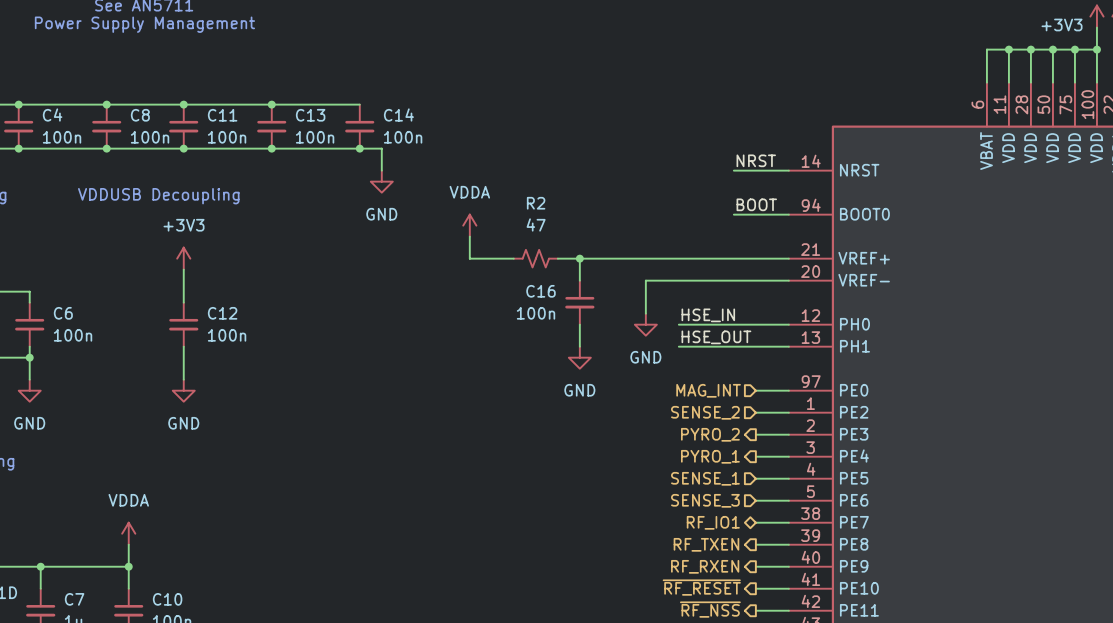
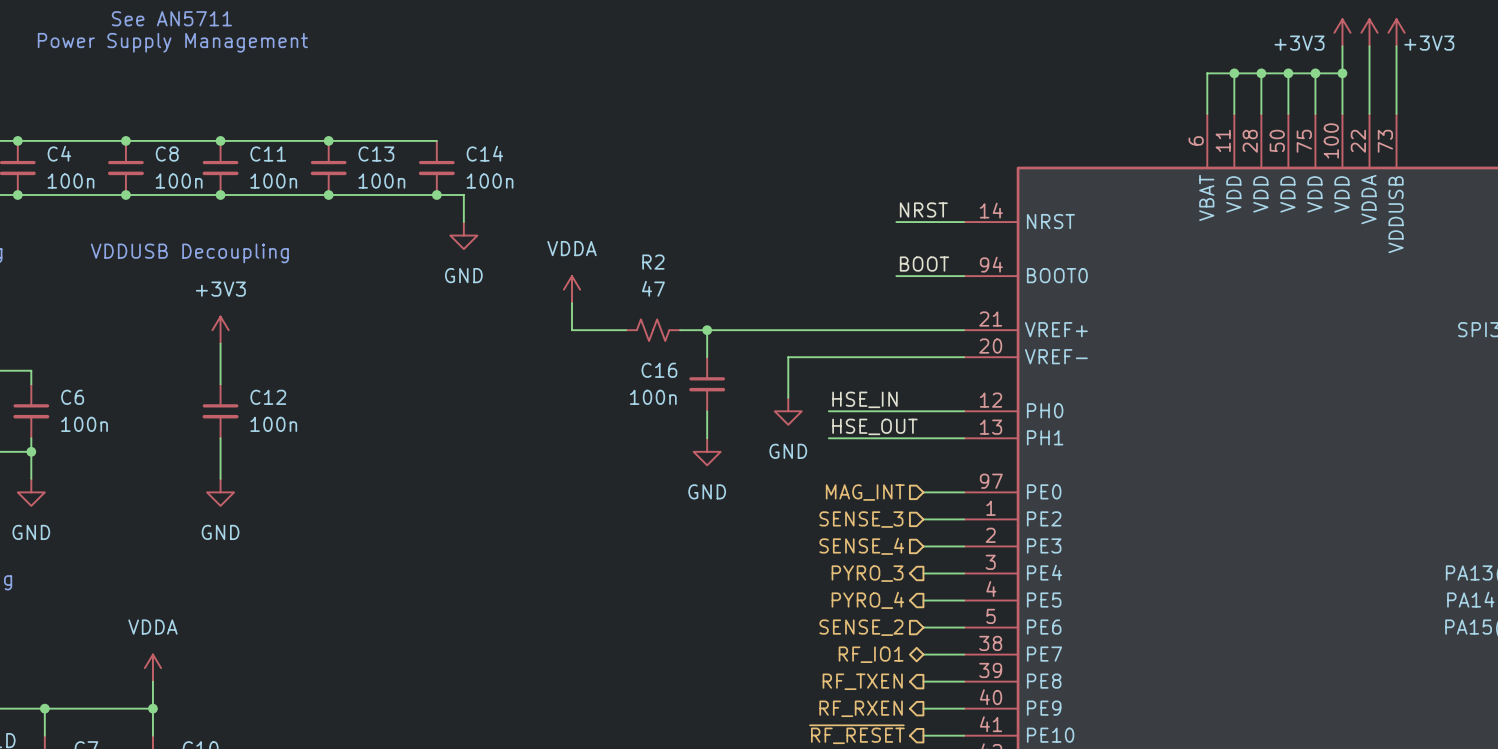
hierarchical label: SENSE_2 (705, 412) -> SENSE_3 (861, 519)
hierarchical label shape: output (710, 434) -> input (861, 546)
hierarchical label: PYRO_2 (710, 434) -> SENSE_4 (861, 546)
hierarchical label: PYRO_1 (710, 456) -> PYRO_3 (867, 573)
hierarchical label shape: input (705, 478) -> output (867, 600)
hierarchical label: SENSE_1 (705, 478) -> PYRO_4 (867, 600)
hierarchical label: SENSE_3 (705, 500) -> SENSE_2 (861, 627)

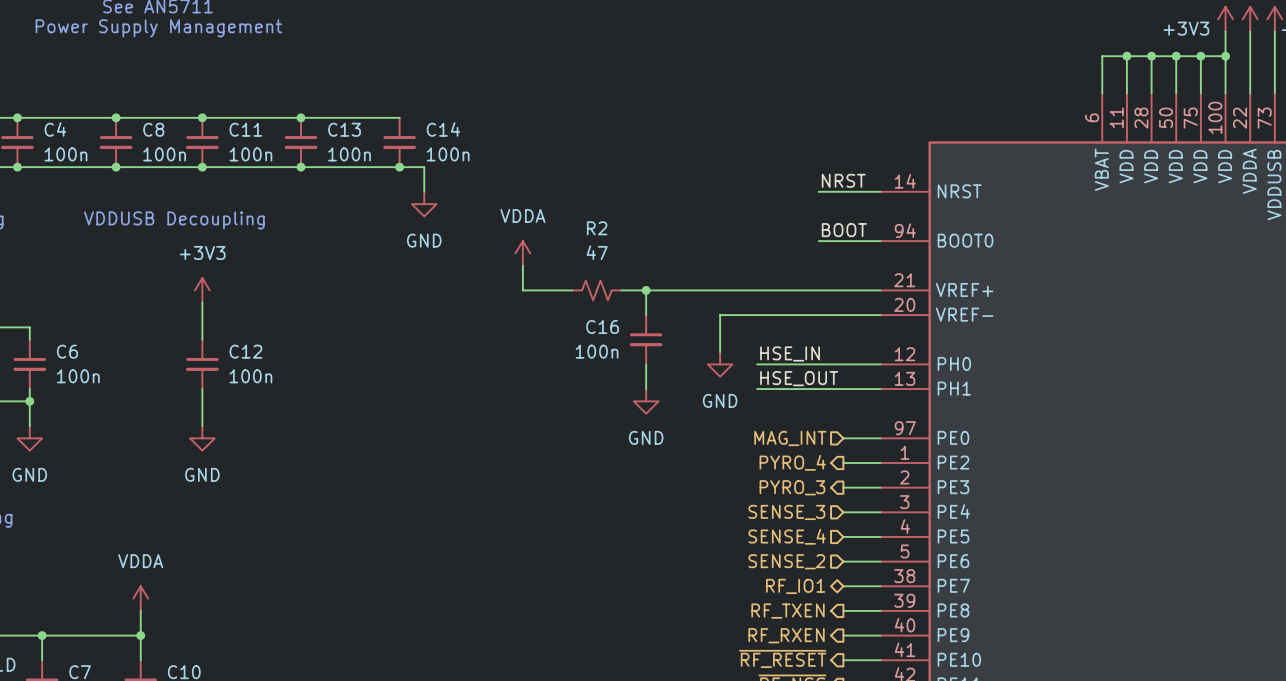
hierarchical label shape: input (861, 519) -> output (792, 462)
hierarchical label: SENSE_3 (861, 519) -> PYRO_4 (792, 462)
hierarchical label shape: input (861, 546) -> output (792, 487)
hierarchical label: SENSE_4 (861, 546) -> PYRO_3 (792, 487)
hierarchical label shape: output (867, 573) -> input (786, 512)
hierarchical label: PYRO_3 (867, 573) -> SENSE_3 (786, 512)
hierarchical label shape: output (867, 600) -> input (787, 536)
hierarchical label: PYRO_4 (867, 600) -> SENSE_4 (787, 536)

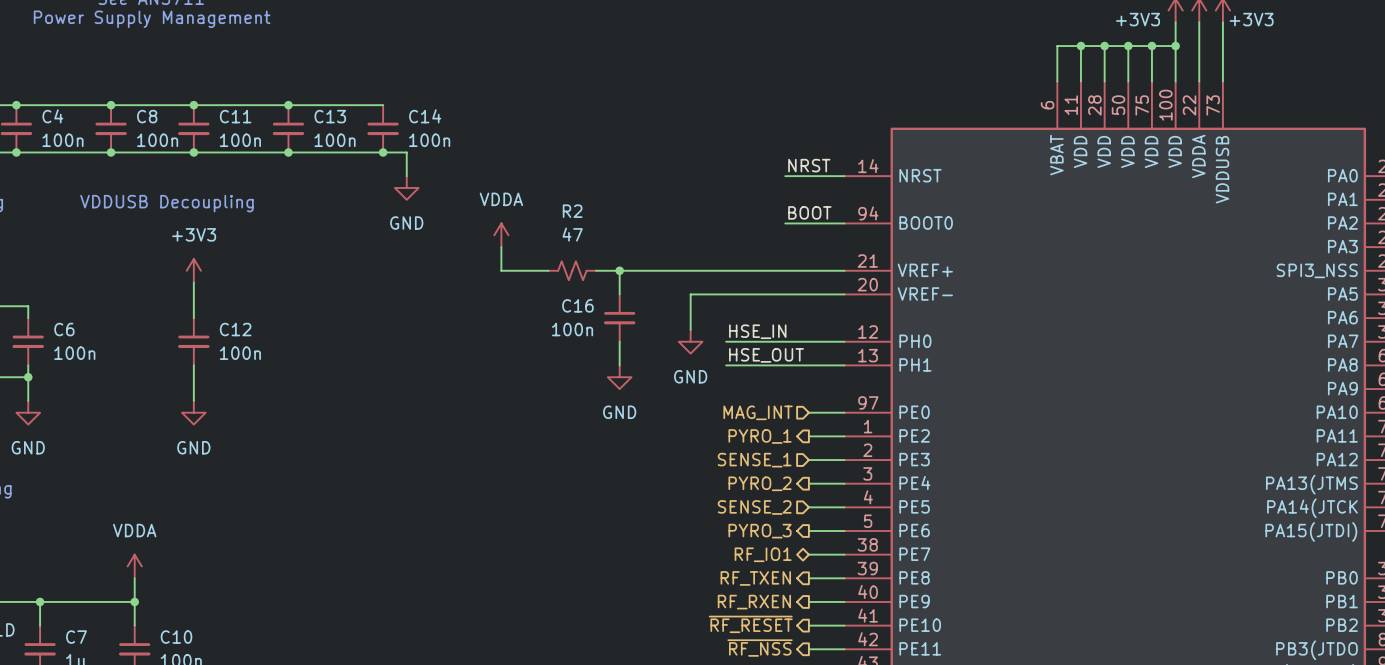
hierarchical label: PYRO_4 (792, 462) -> PYRO_1 (760, 436)
hierarchical label shape: output (792, 487) -> input (754, 460)
hierarchical label: PYRO_3 (792, 487) -> SENSE_1 (754, 460)
hierarchical label shape: input (786, 512) -> output (760, 483)
hierarchical label: SENSE_3 (786, 512) -> PYRO_2 (760, 483)
hierarchical label: SENSE_4 (787, 536) -> SENSE_2 (754, 507)
hierarchical label shape: input (786, 561) -> output (760, 531)
hierarchical label: SENSE_2 (786, 561) -> PYRO_3 (760, 531)

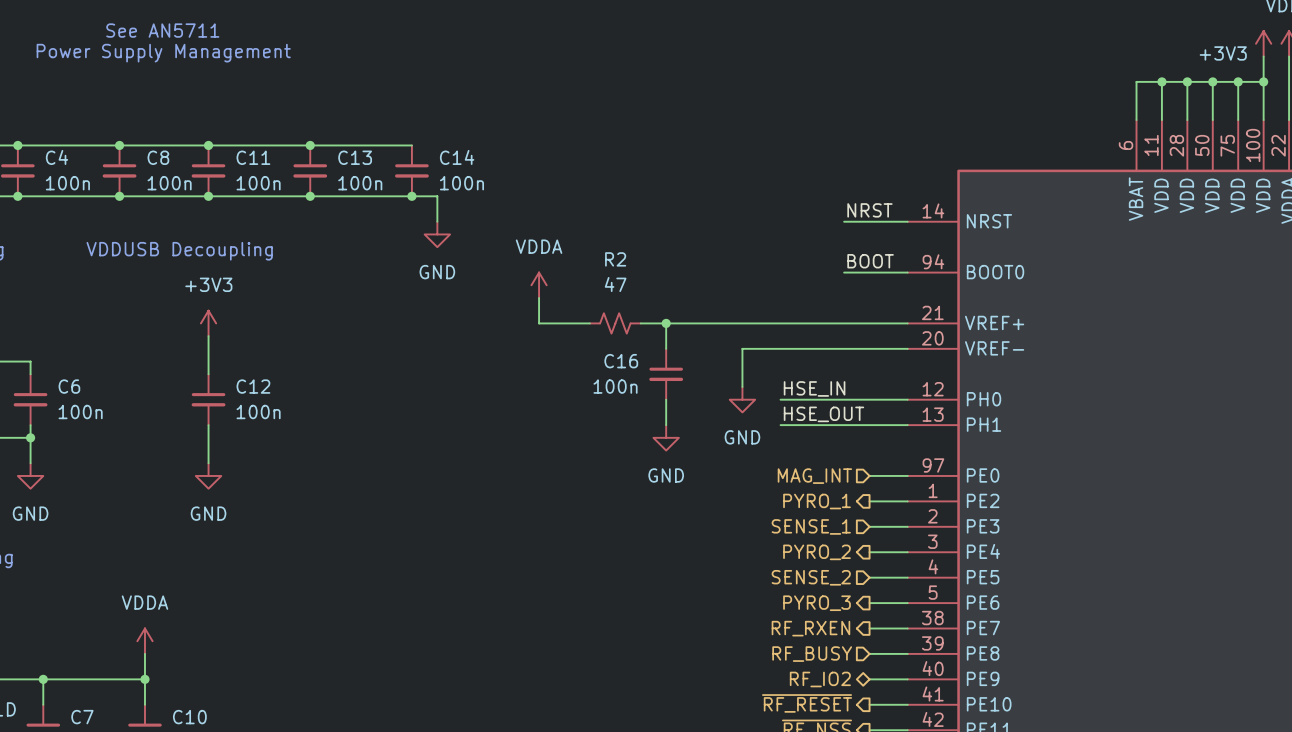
hierarchical label shape: bidirectional (763, 554) -> output (810, 628)
hierarchical label: RF_IO1 (763, 554) -> RF_RXEN (810, 628)
hierarchical label shape: output (755, 578) -> input (812, 654)
hierarchical label: RF_TXEN (755, 578) -> RF_BUSY (812, 654)
hierarchical label shape: output (754, 602) -> bidirectional (820, 679)
hierarchical label: RF_RXEN (754, 602) -> RF_IO2 (820, 679)

